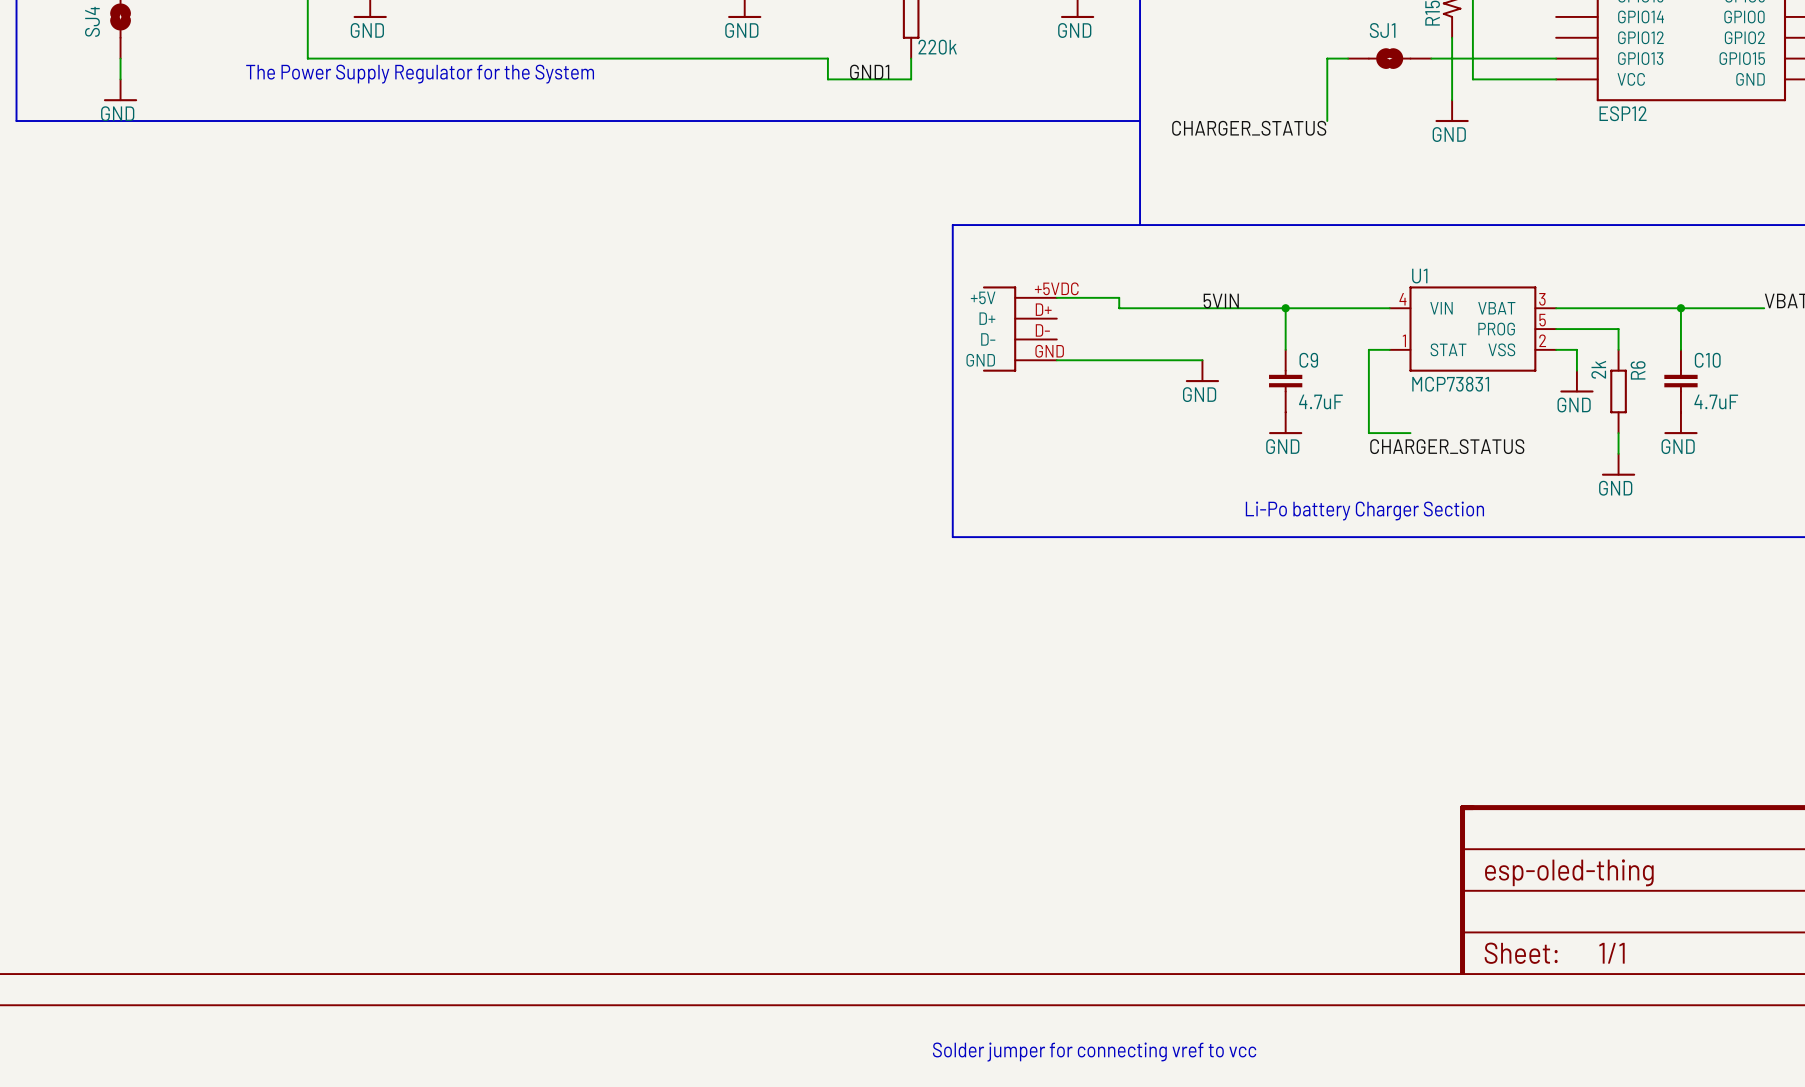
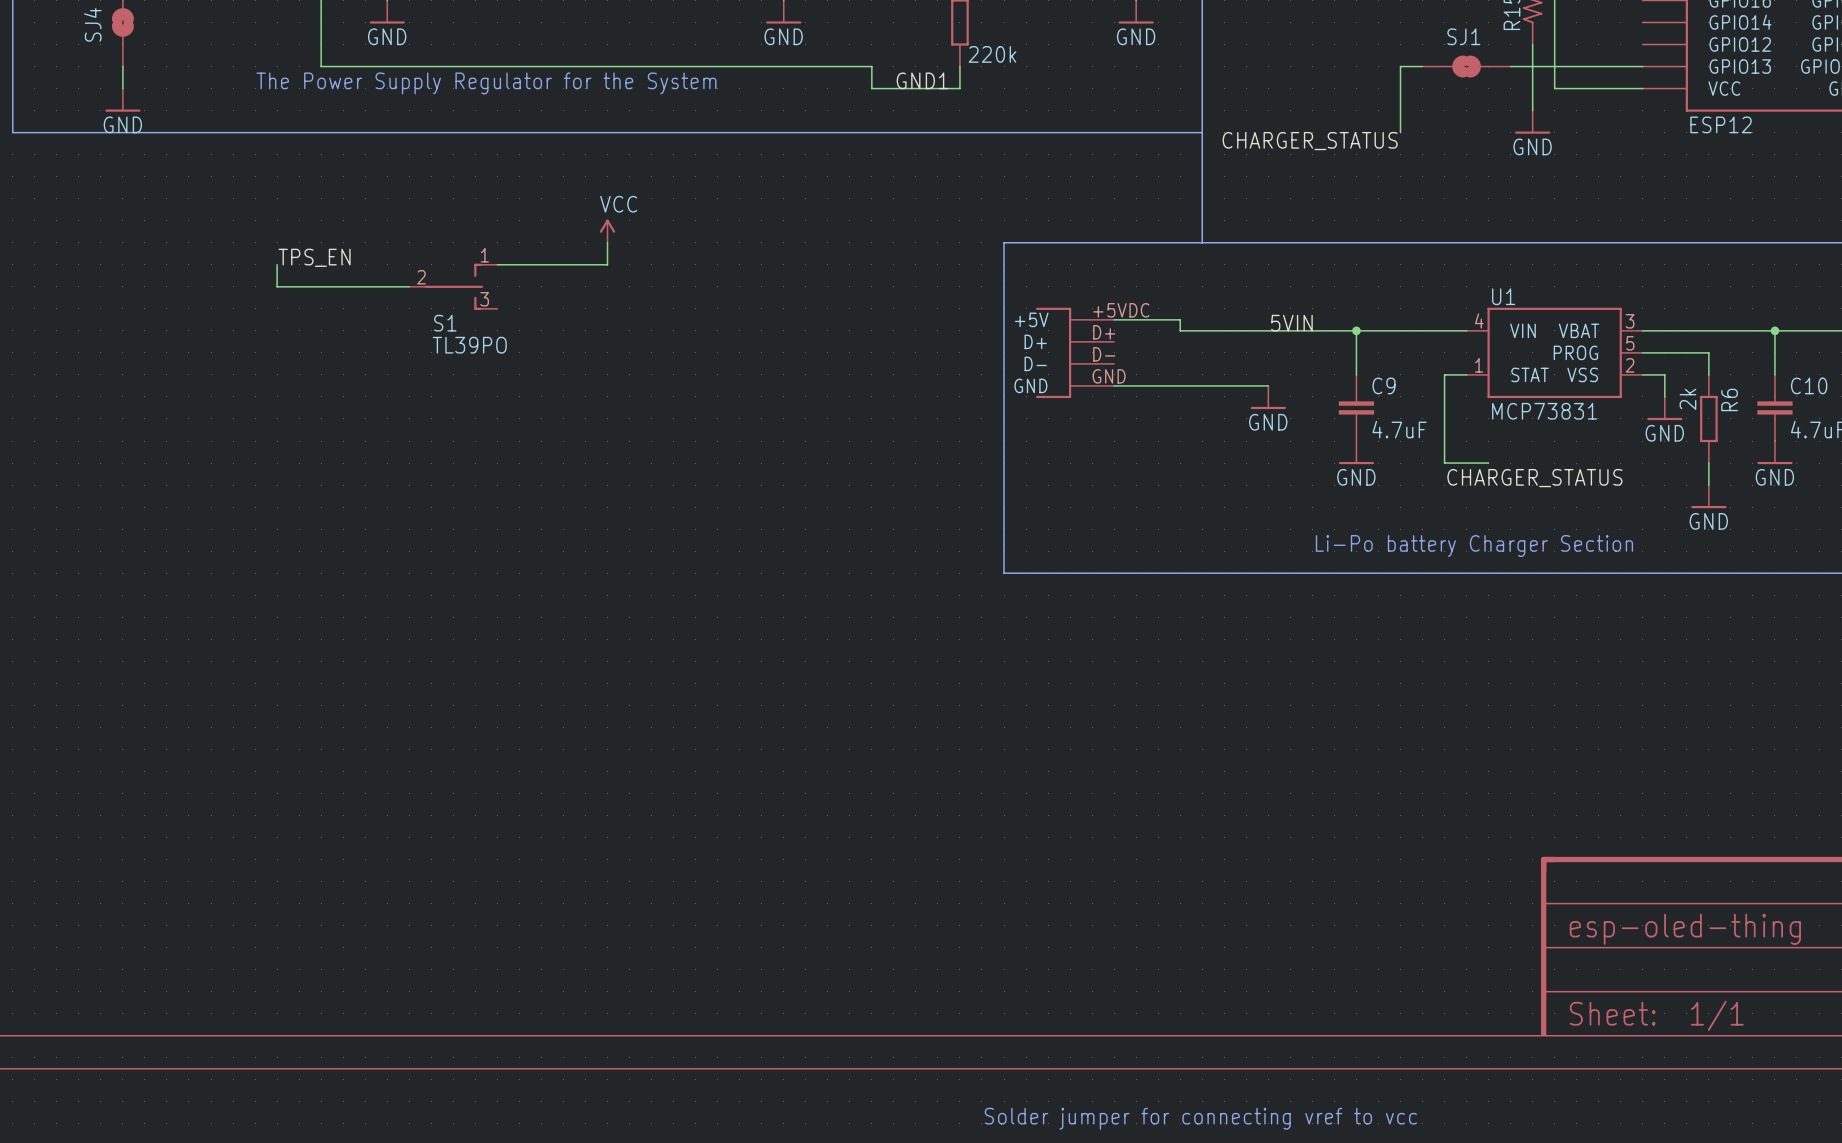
power symbol: none -> VCC (607, 231)
wire: none -> (607, 242) (607, 264) (497, 264)
label: none -> TPS_EN (314, 257)
wire: none -> (277, 264) (277, 286) (409, 286)
S1: none -> TL39PO (453, 286)

